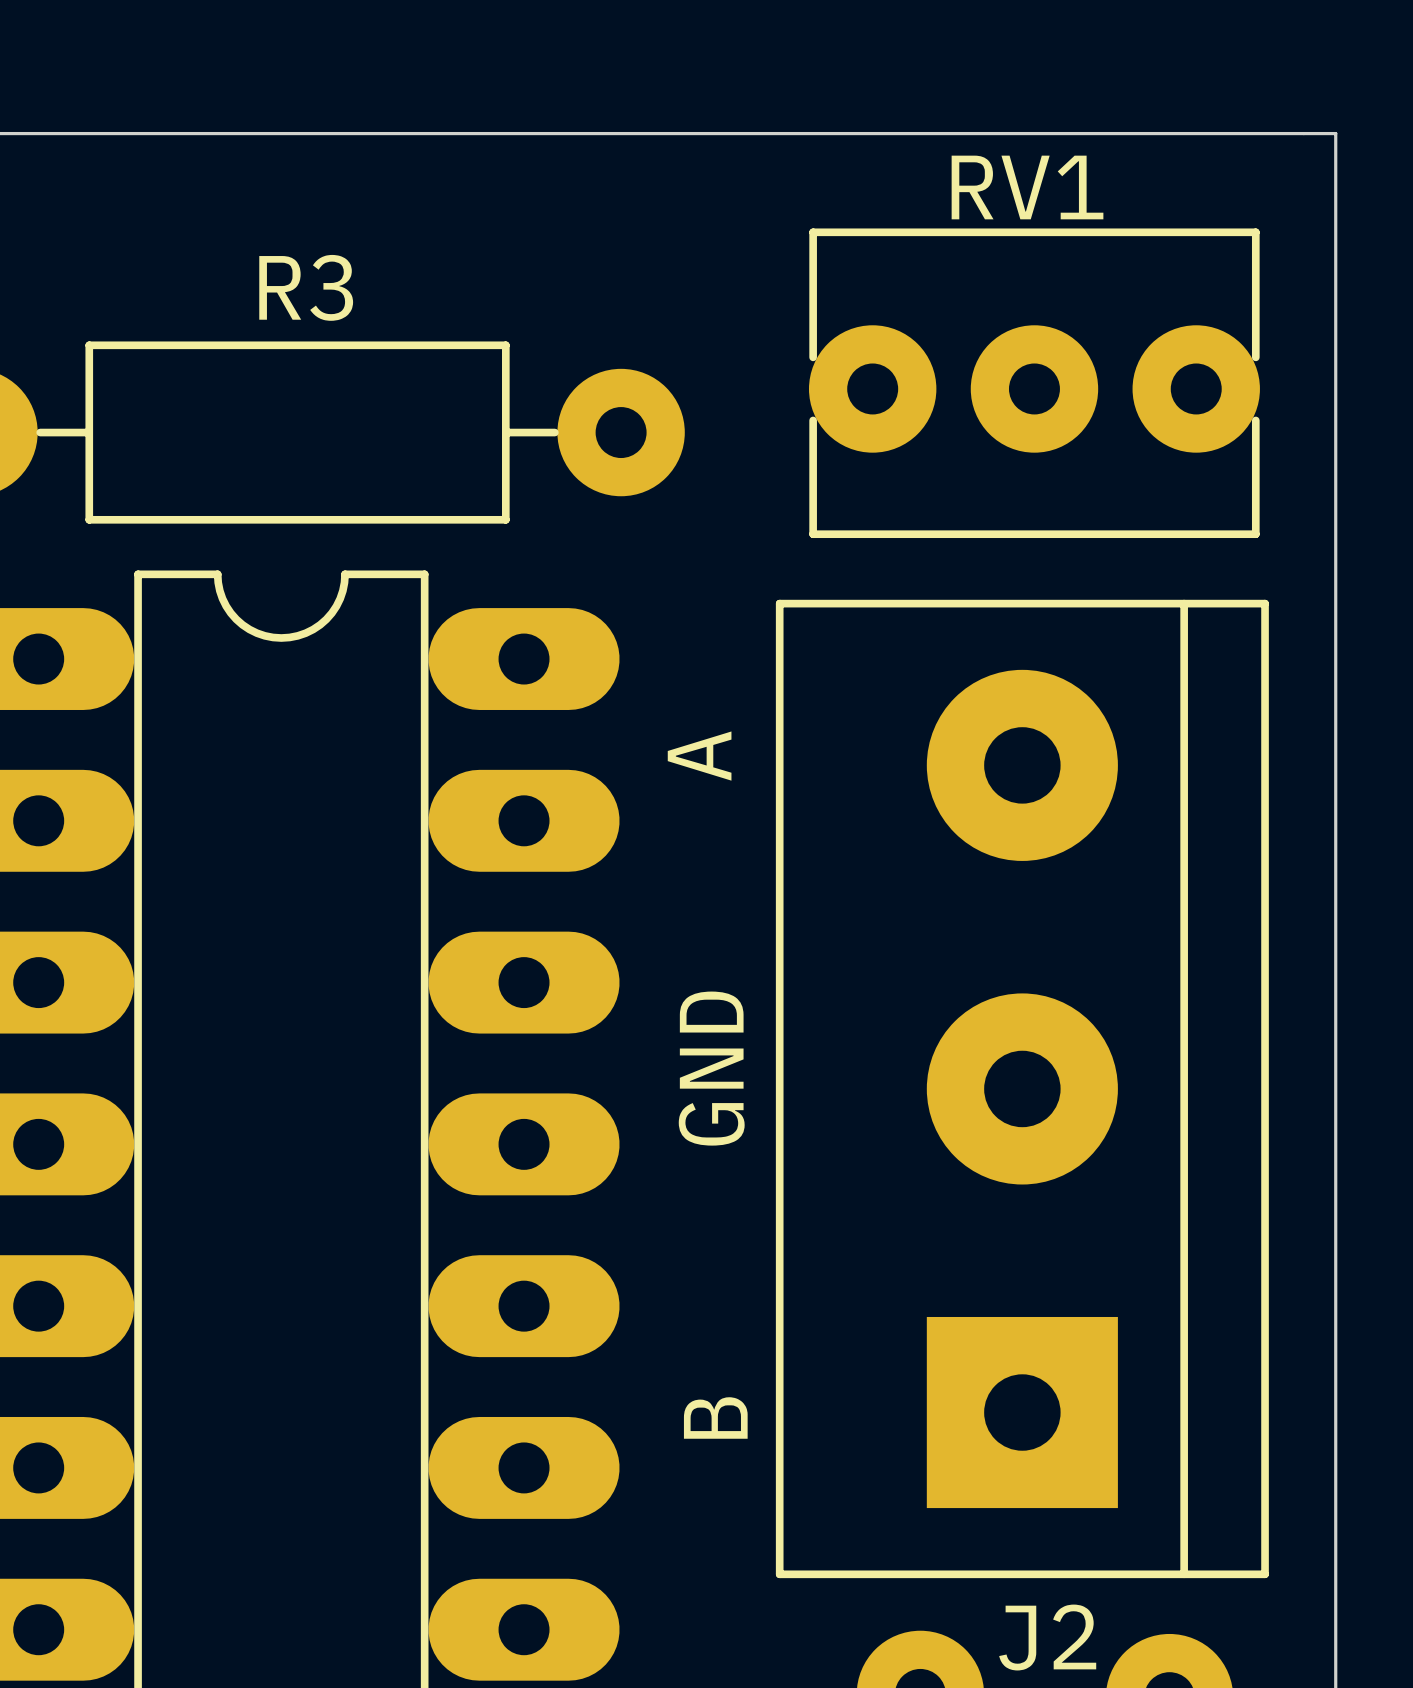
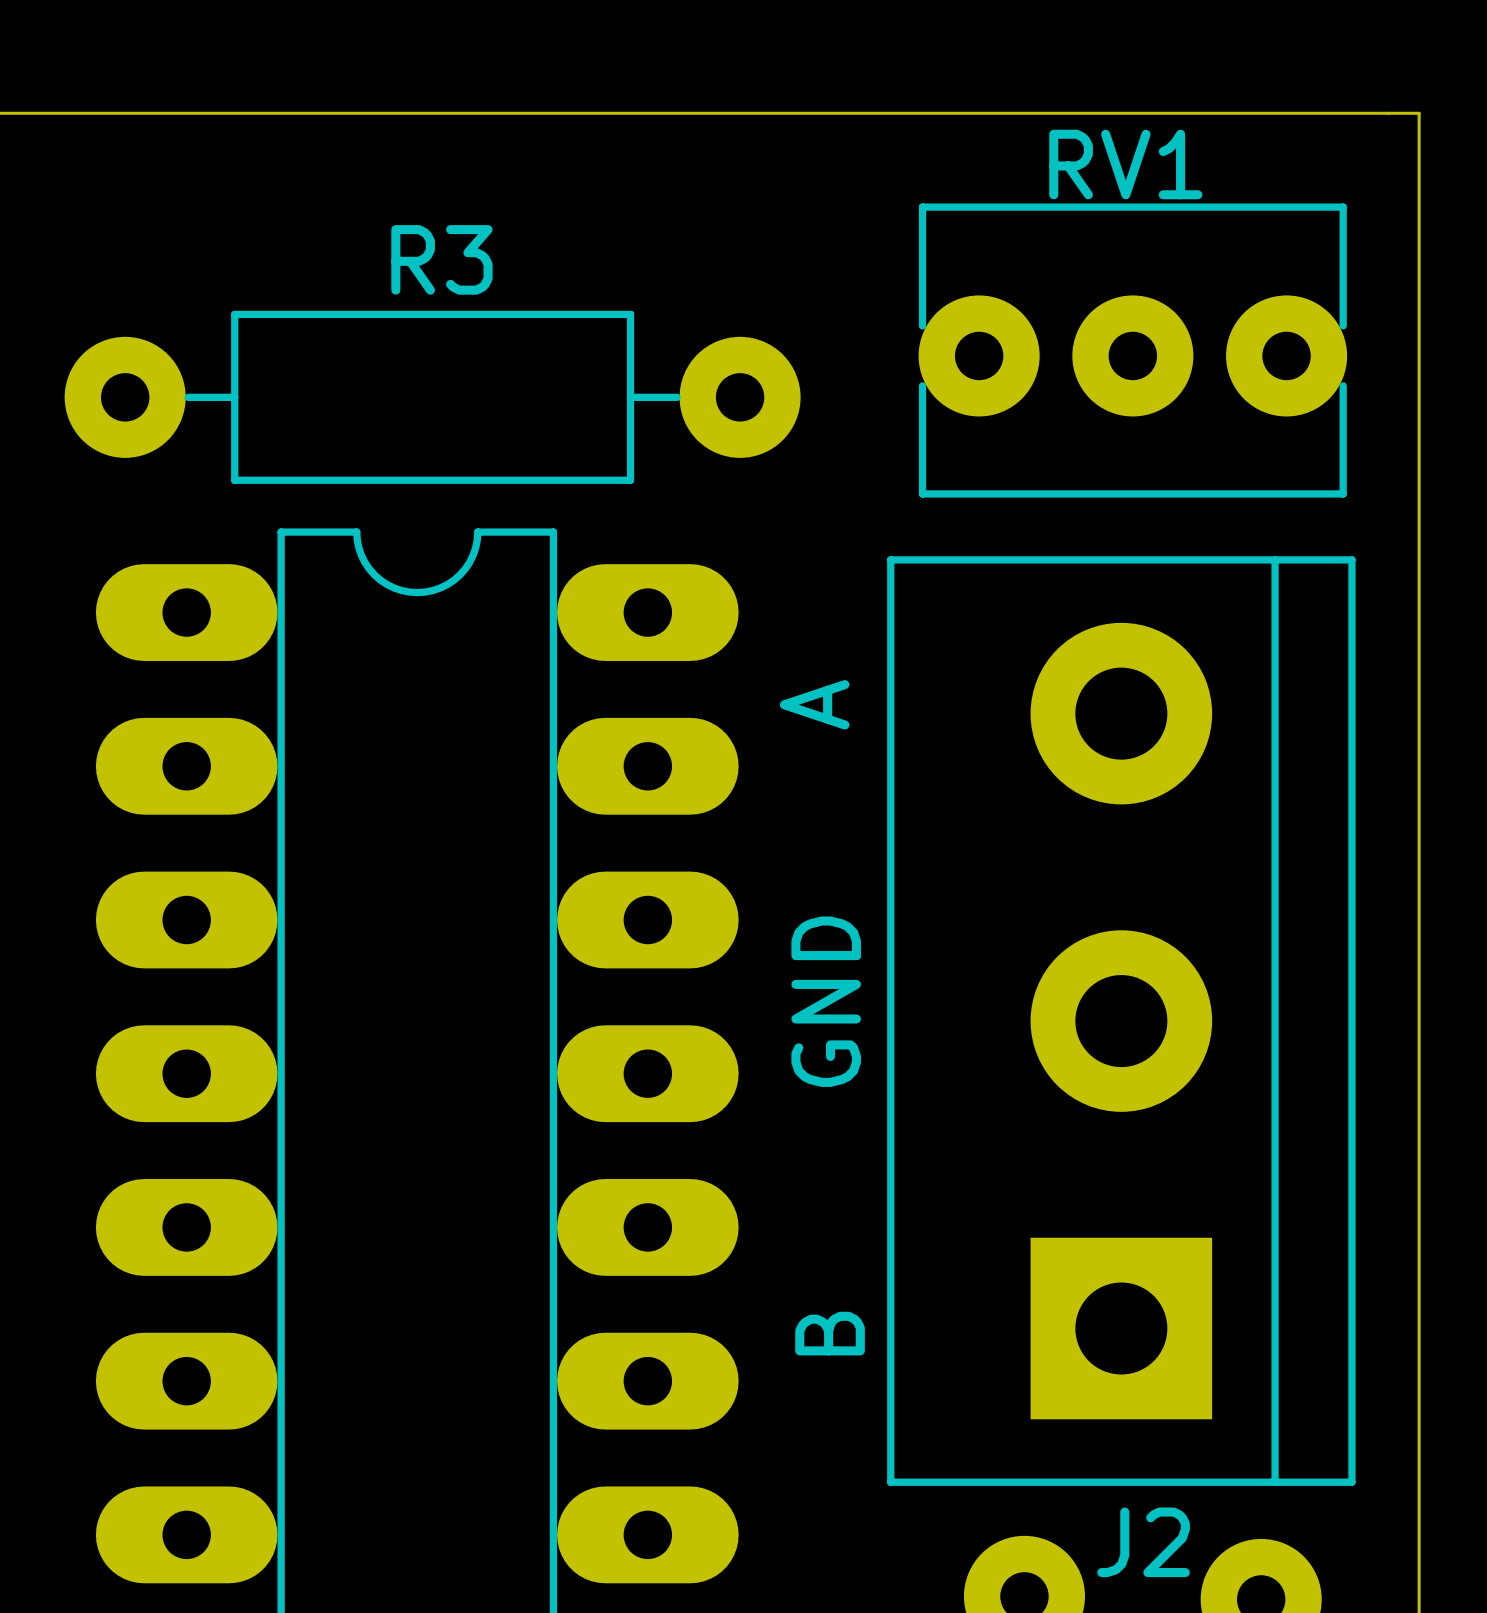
J2 footprint: [775, 599, 1269, 1579] -> [887, 556, 1356, 1486]

